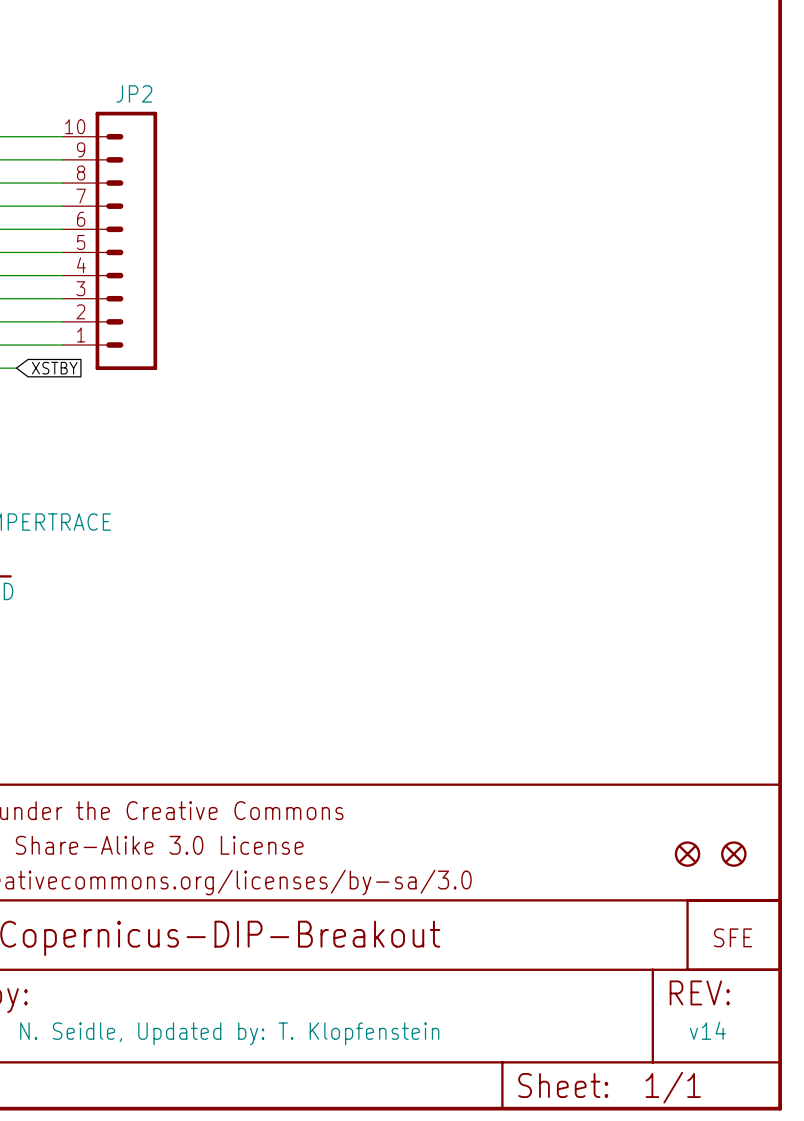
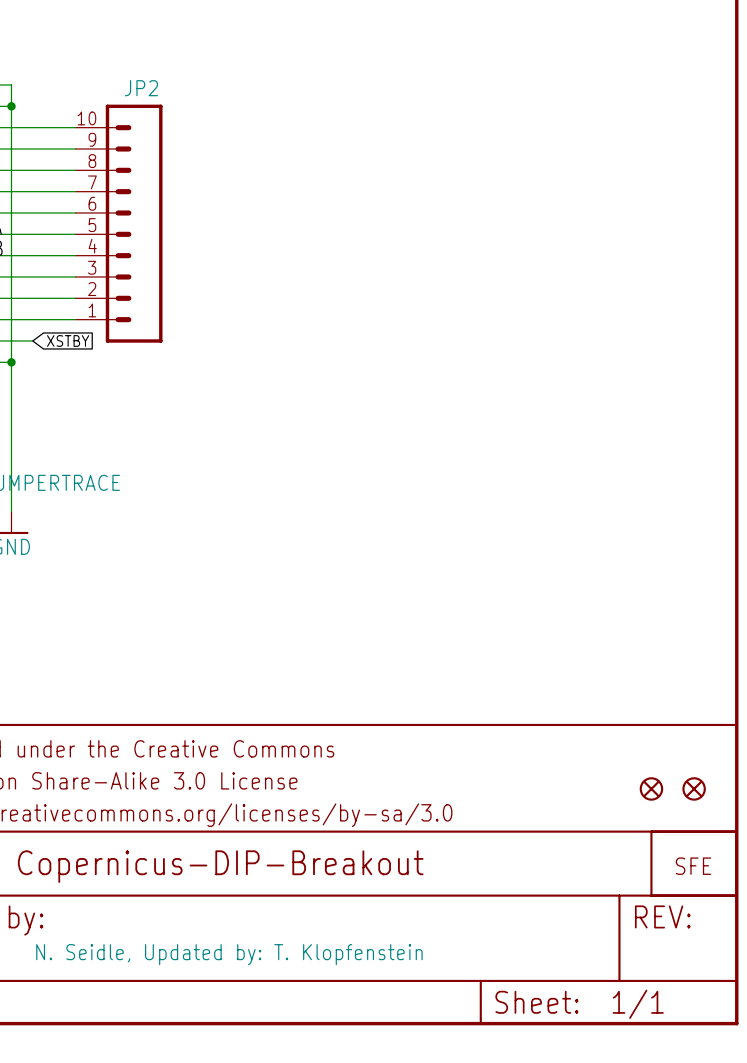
text: v14 (707, 1030) -> none

